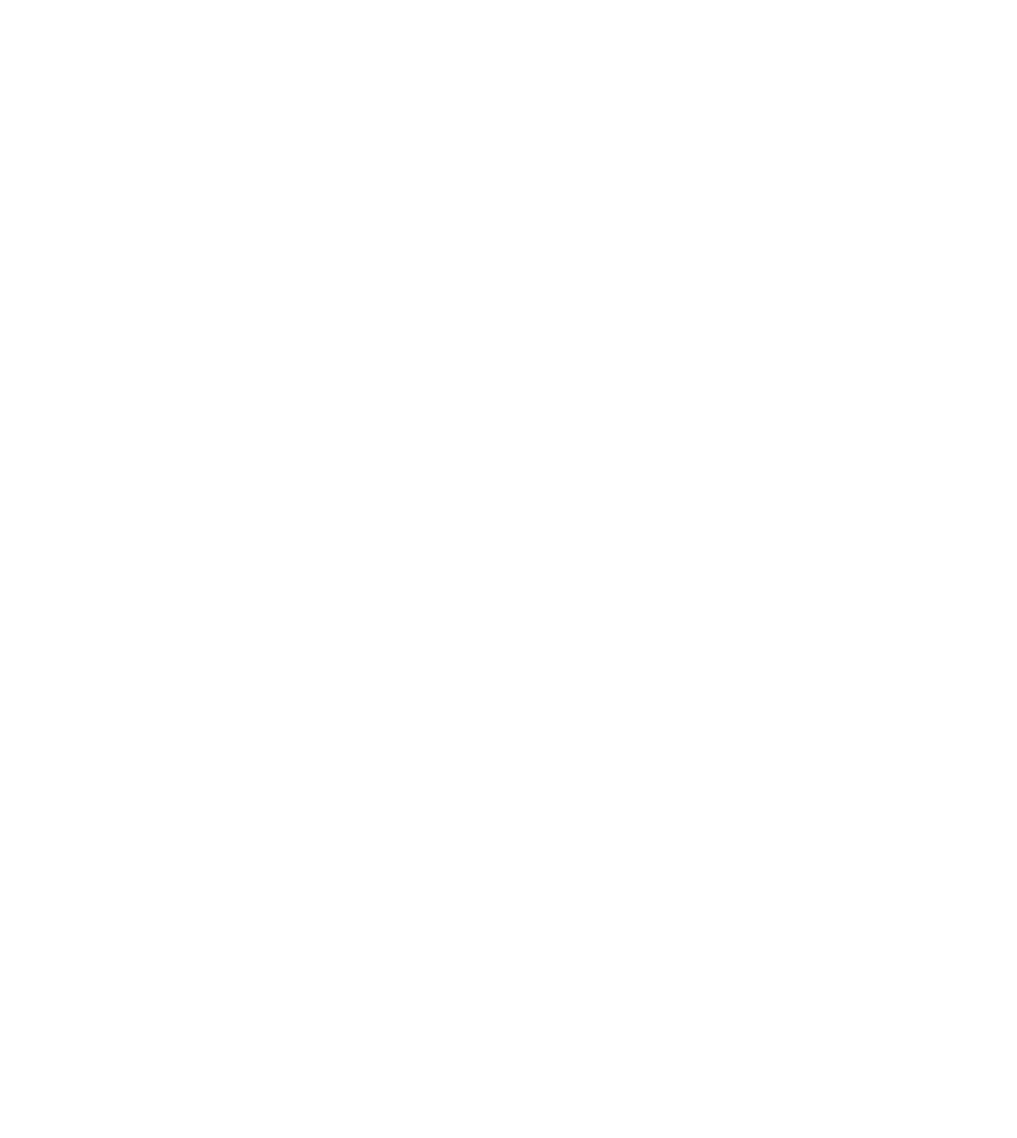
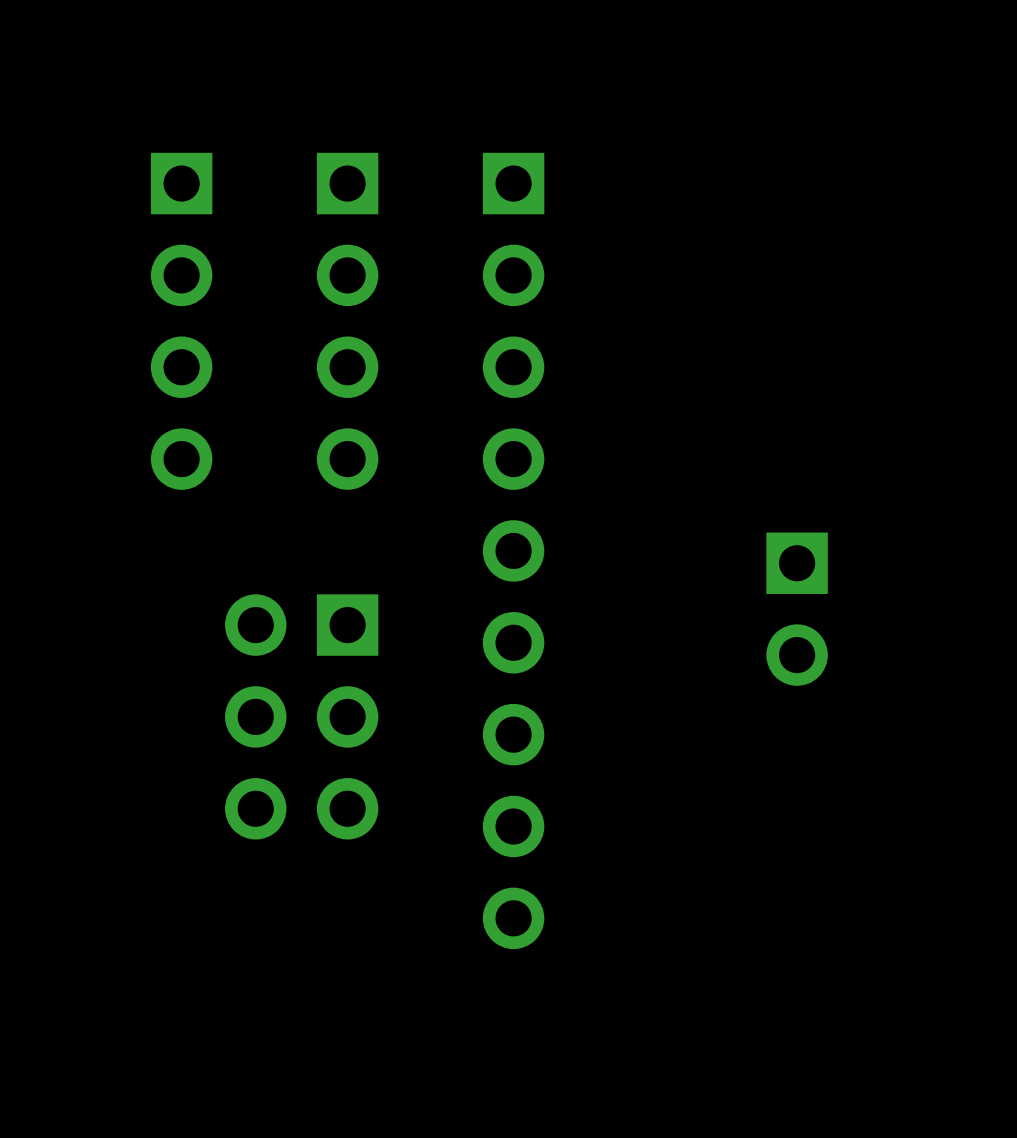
part: none -> (181, 321)
part: none -> (347, 321)
part: none -> (513, 550)
part: none -> (797, 609)
part: none -> (301, 716)

